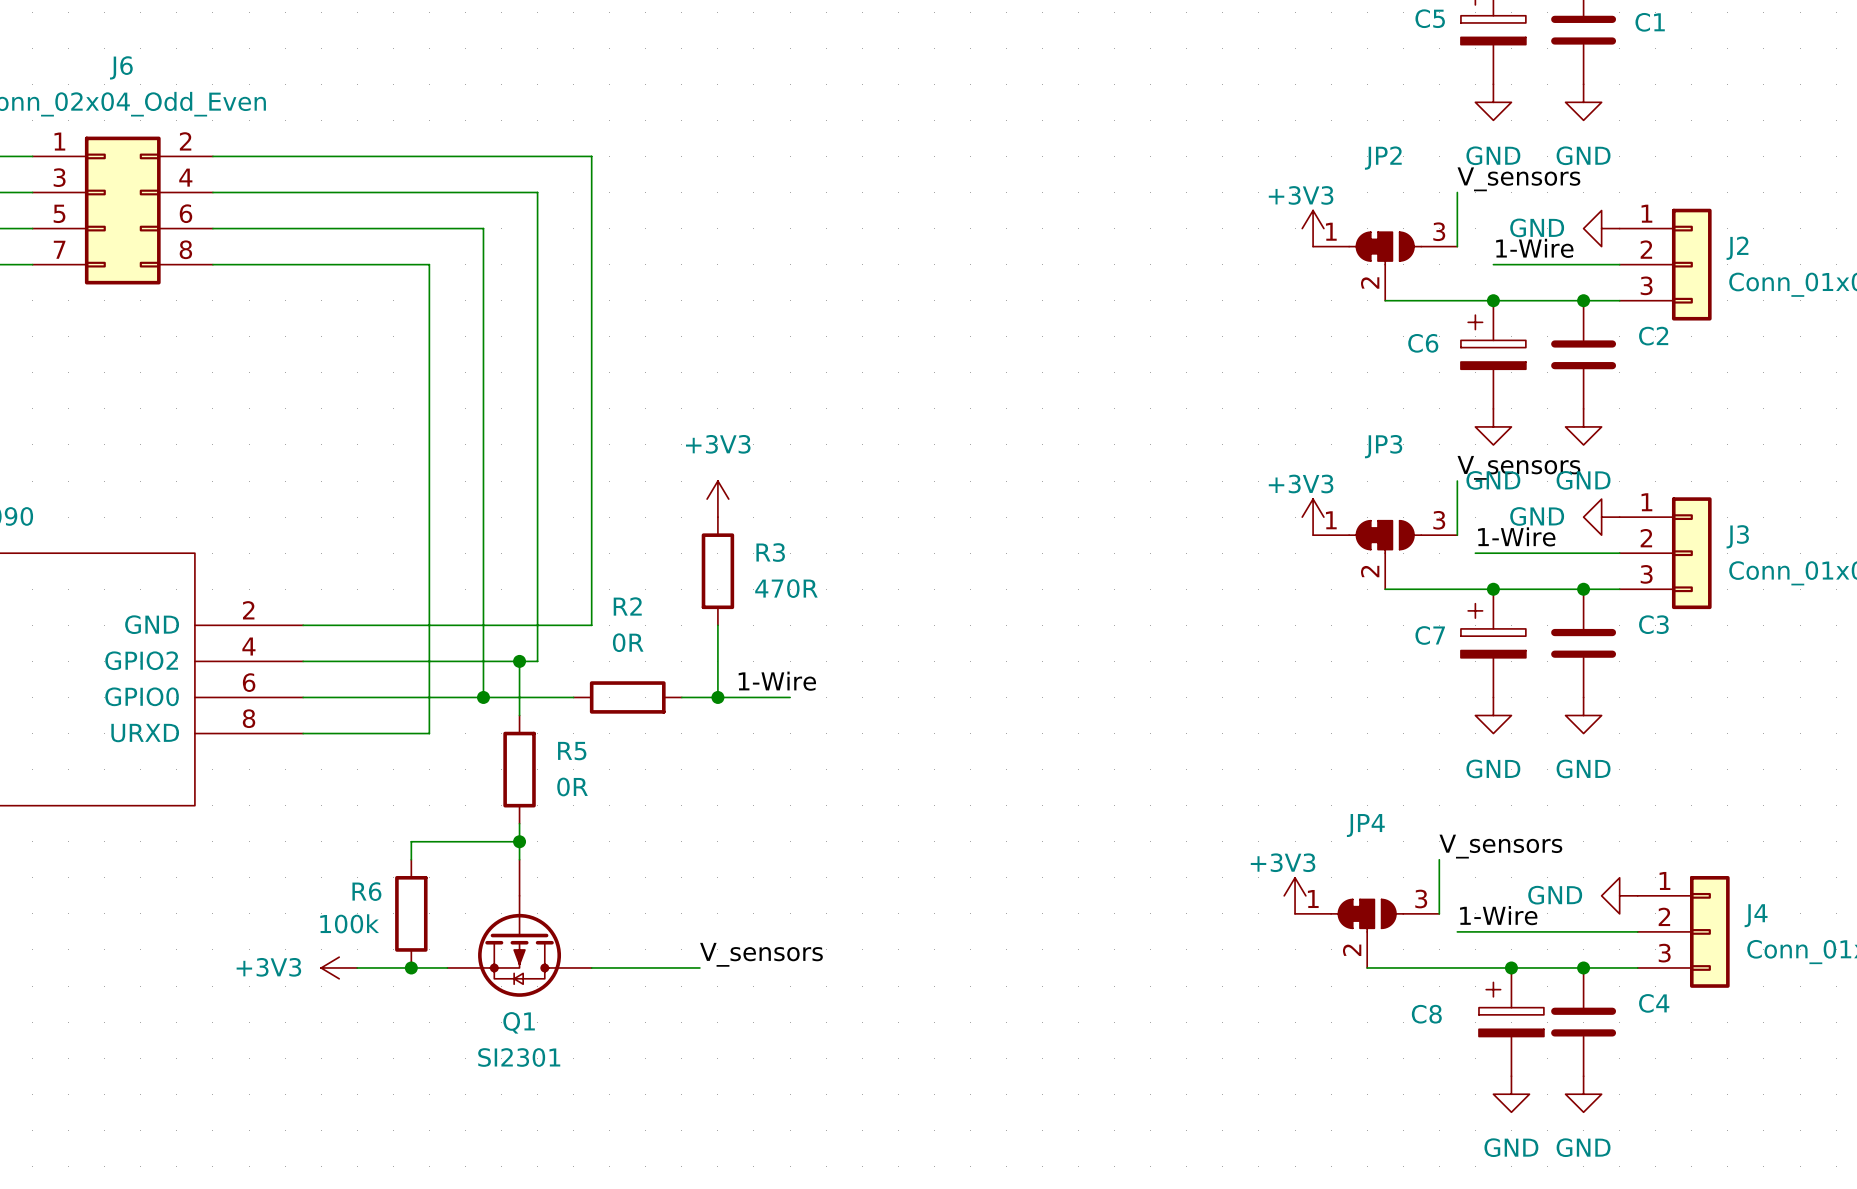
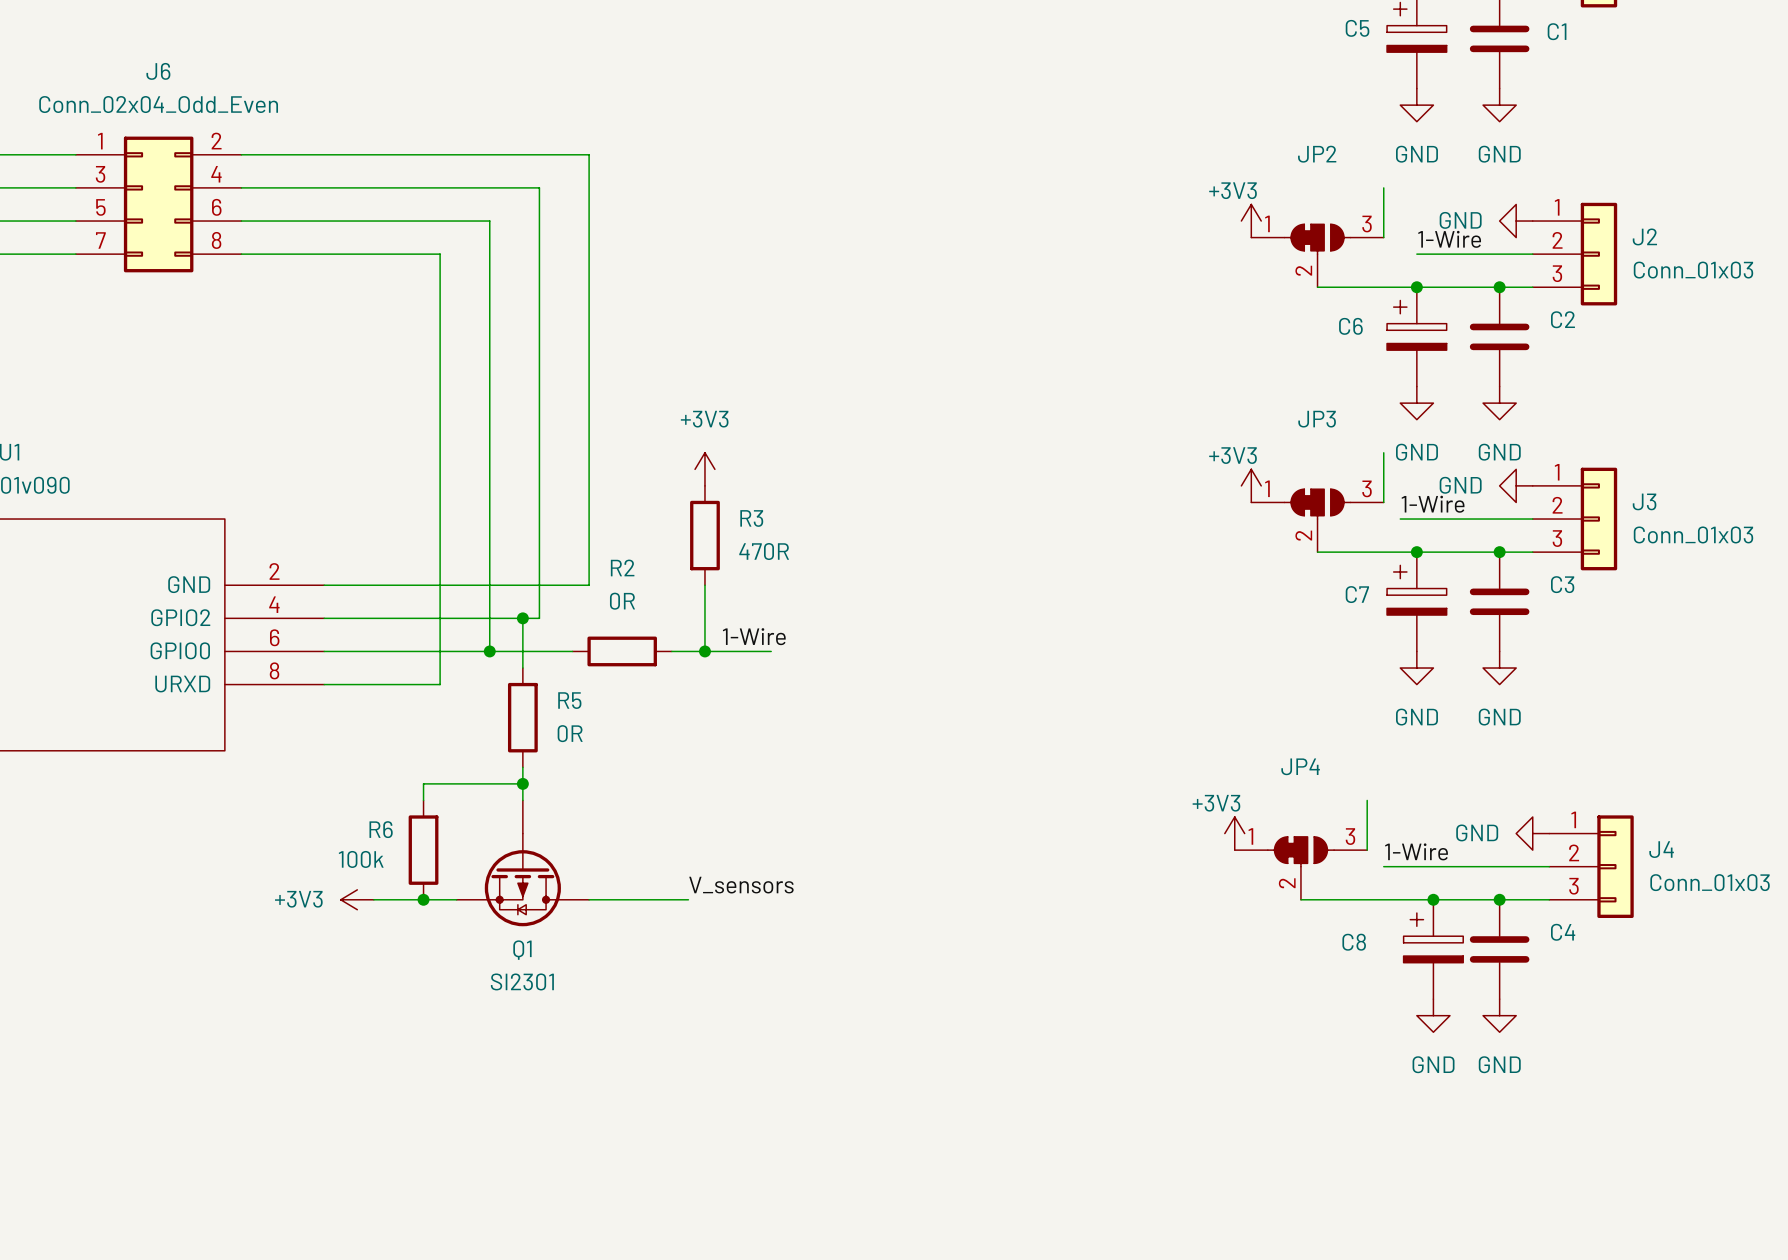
label: V_sensors (1518, 179) -> none
label: V_sensors (1518, 467) -> none
label: V_sensors (1500, 846) -> none

